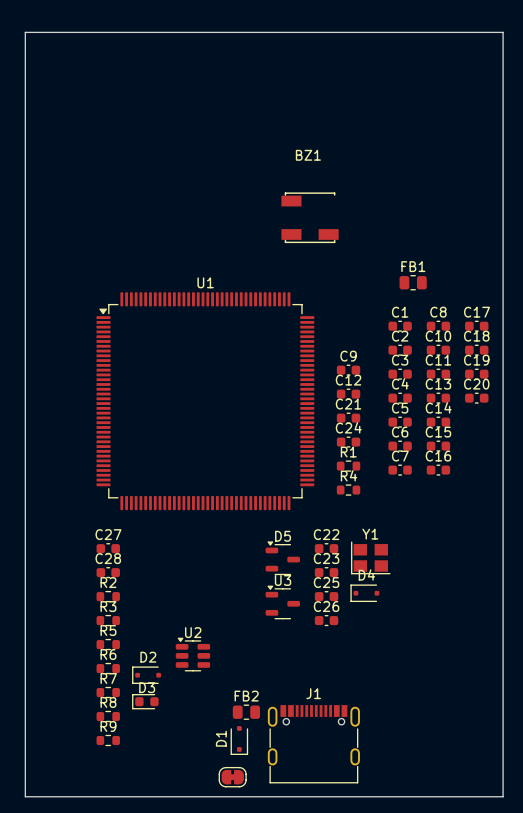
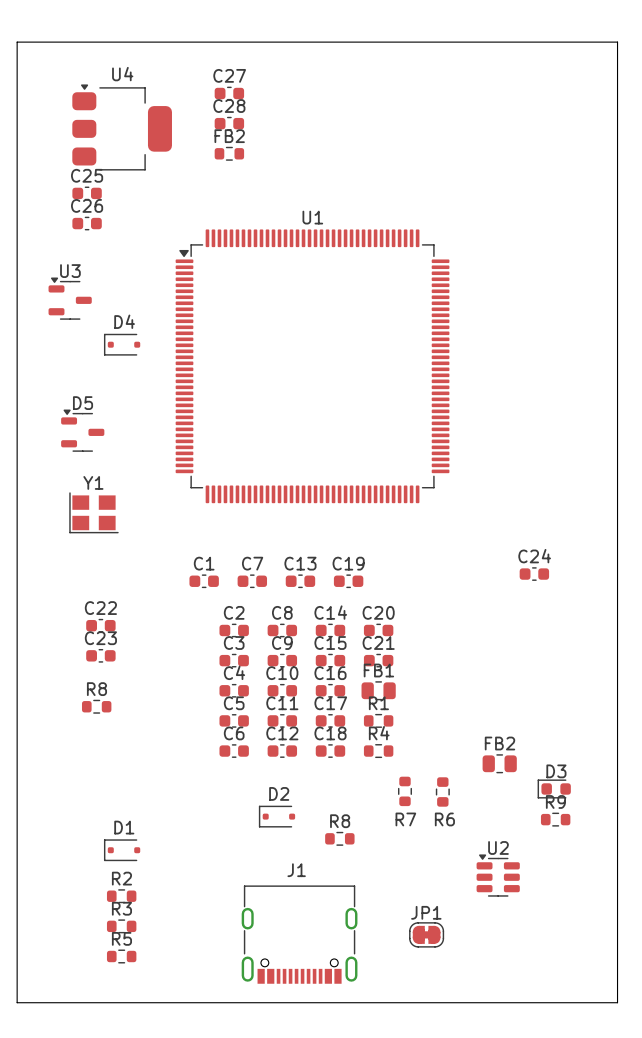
U4: none -> (122, 127)
FB2: none -> (229, 153)
BZ1: (310, 217) -> none
FB1 position: (413, 282) -> (378, 690)
C1 position: (400, 326) -> (204, 581)
C8 position: (438, 326) -> (282, 630)
C17 position: (476, 326) -> (330, 720)
C2 position: (400, 350) -> (234, 630)
C10 position: (438, 350) -> (282, 690)
C18 position: (476, 350) -> (330, 751)
C9 position: (348, 370) -> (282, 660)
C3 position: (400, 374) -> (234, 660)
C11 position: (438, 374) -> (282, 720)
C19 position: (476, 374) -> (348, 581)
C12 position: (348, 394) -> (282, 751)
C4 position: (400, 398) -> (234, 690)
C13 position: (438, 398) -> (300, 581)
C20 position: (476, 398) -> (378, 630)
U1 position: (205, 401) -> (312, 366)
C21 position: (348, 418) -> (378, 660)
C5 position: (400, 422) -> (234, 720)
C14 position: (438, 422) -> (330, 630)
C24 position: (348, 442) -> (534, 574)
C6 position: (400, 446) -> (234, 751)
C15 position: (438, 446) -> (330, 660)
R1 position: (348, 466) -> (378, 720)
C7 position: (400, 470) -> (252, 581)
C16 position: (438, 470) -> (330, 690)
R4 position: (348, 490) -> (378, 751)
C27 position: (108, 548) -> (229, 93)
C22 position: (326, 548) -> (100, 625)
Y1 position: (370, 557) -> (93, 512)
D5 position: (282, 558) -> (82, 430)
R8: none -> (96, 706)
C28 position: (108, 572) -> (229, 123)
C23 position: (326, 572) -> (100, 655)
D4 position: (364, 593) -> (122, 344)
R2 position: (108, 596) -> (121, 896)
C25 position: (326, 596) -> (87, 193)
U3 position: (282, 602) -> (70, 298)
R3 position: (108, 620) -> (121, 926)
C26 position: (326, 620) -> (87, 223)
R5 position: (108, 644) -> (121, 956)
R6 name position: R6 (108, 654) -> R6 (444, 819)
U2 position: (192, 654) -> (498, 875)
R8: none -> (339, 838)
R6 rotation: 0° (108, 668) -> 90° clockwise (442, 791)
R6 position: (108, 668) -> (442, 791)
D2 position: (146, 675) -> (276, 816)
R7 name position: R7 (108, 678) -> R7 (405, 819)
R7 rotation: 0° (108, 692) -> 90° clockwise (404, 791)
R7 position: (108, 692) -> (404, 791)
D3 position: (145, 701) -> (554, 788)
FB2 position: (246, 712) -> (499, 763)
R8: (108, 716) -> none
R9 position: (108, 740) -> (555, 819)
D1 rotation: 0° (239, 740) -> 90° clockwise (122, 850)
D1 position: (239, 740) -> (122, 850)
JP1: none -> (426, 934)
J1 rotation: 0° (313, 744) -> 180° (299, 934)
J1 position: (313, 744) -> (299, 934)
part: (232, 777) -> none

